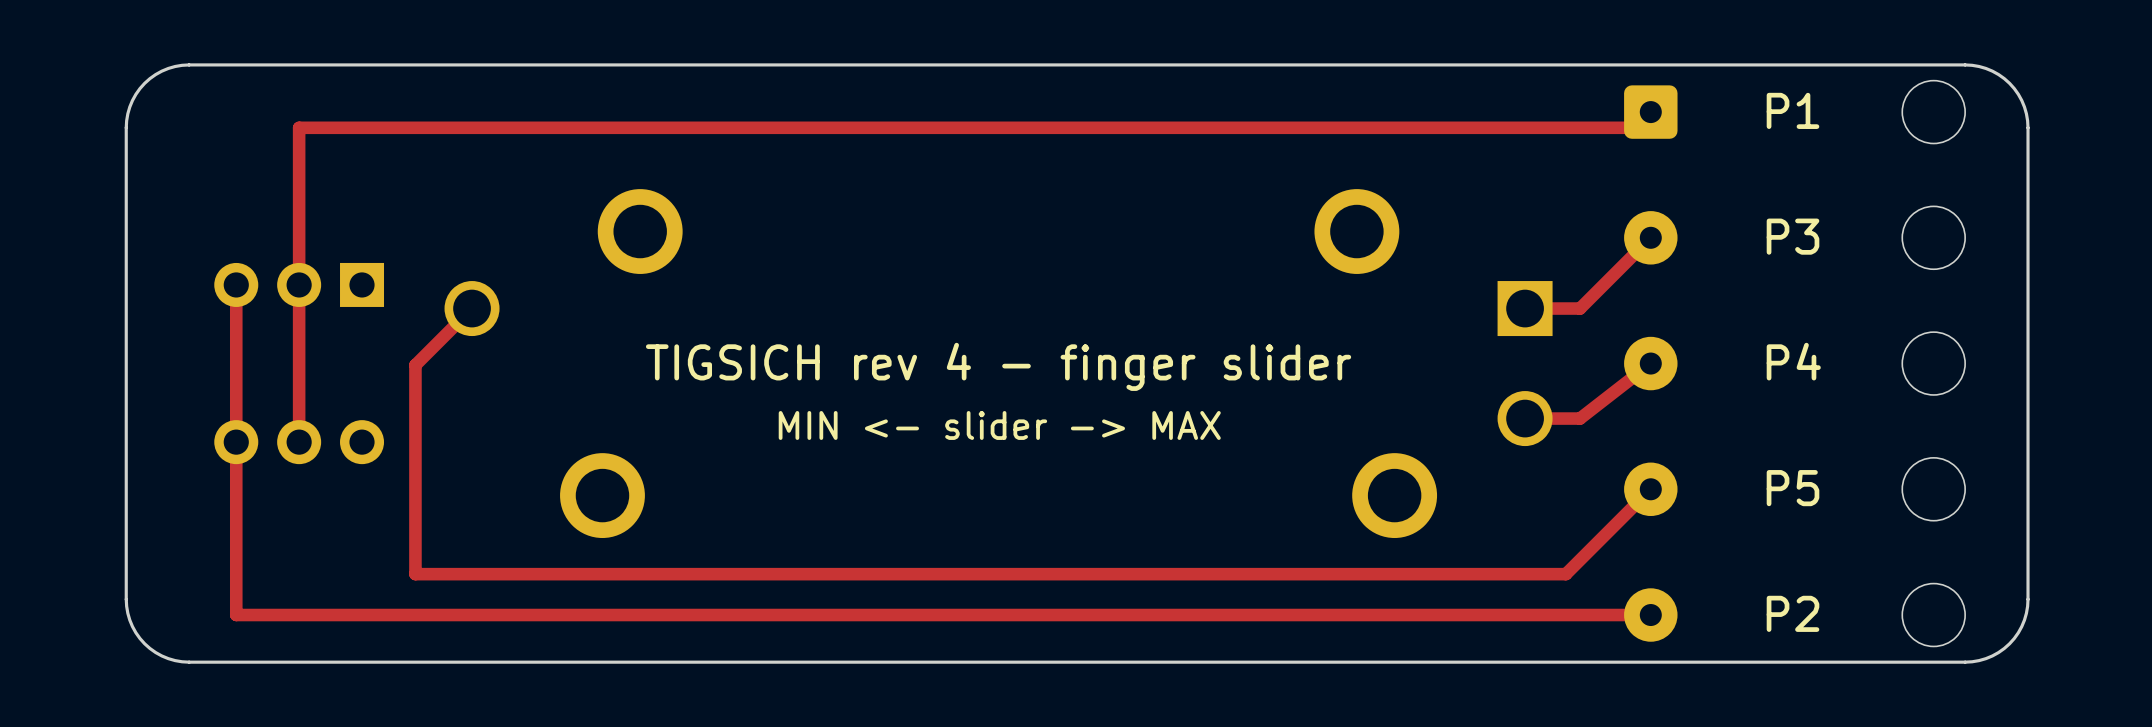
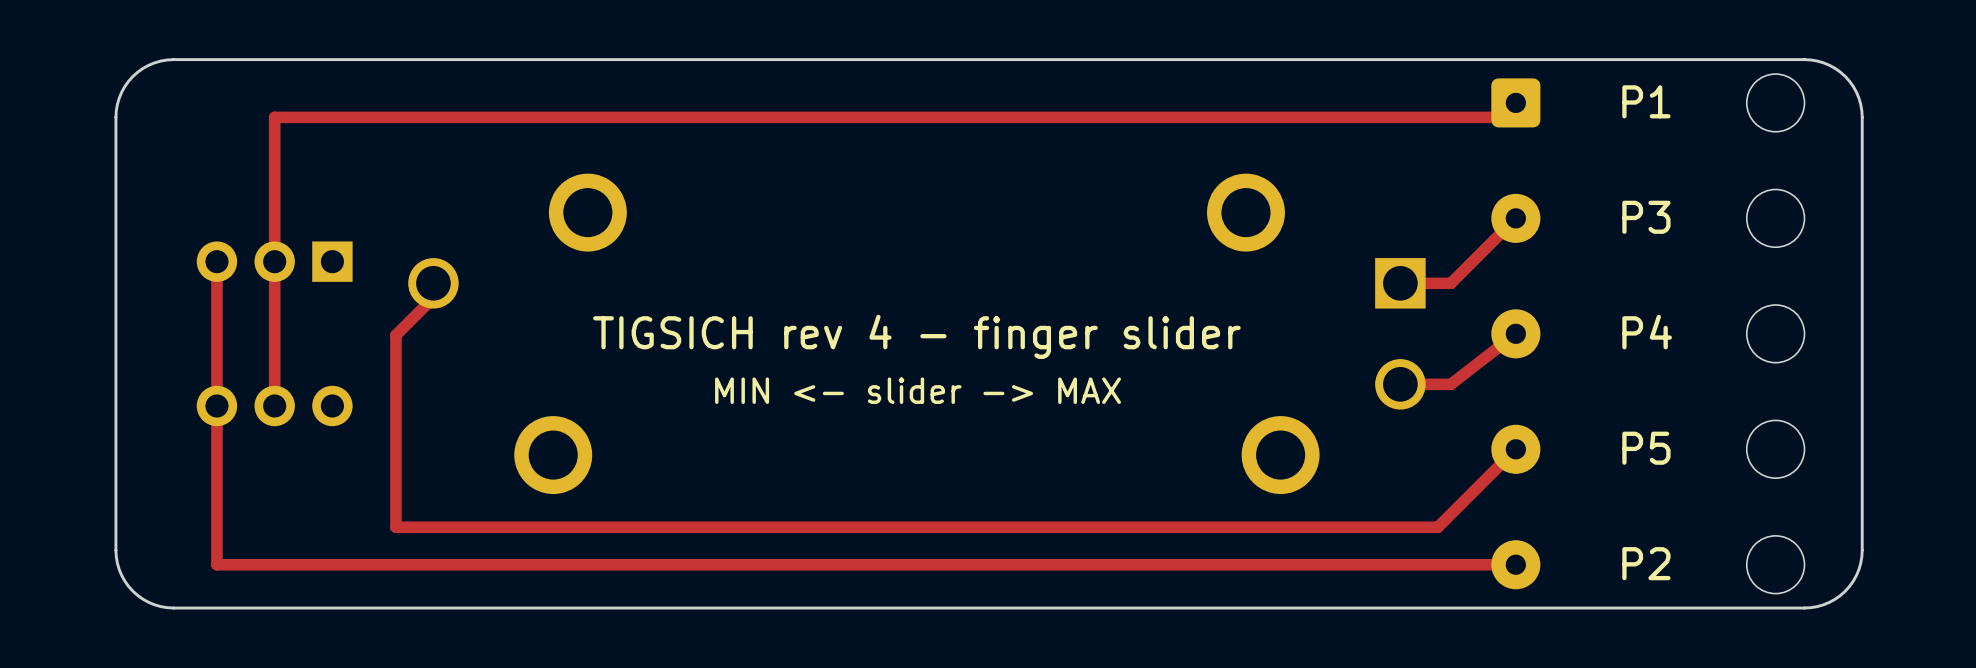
top track: (472, 308) (415, 365) (415, 574) (431, 574) -> (447, 283) (395, 335) (395, 527)

